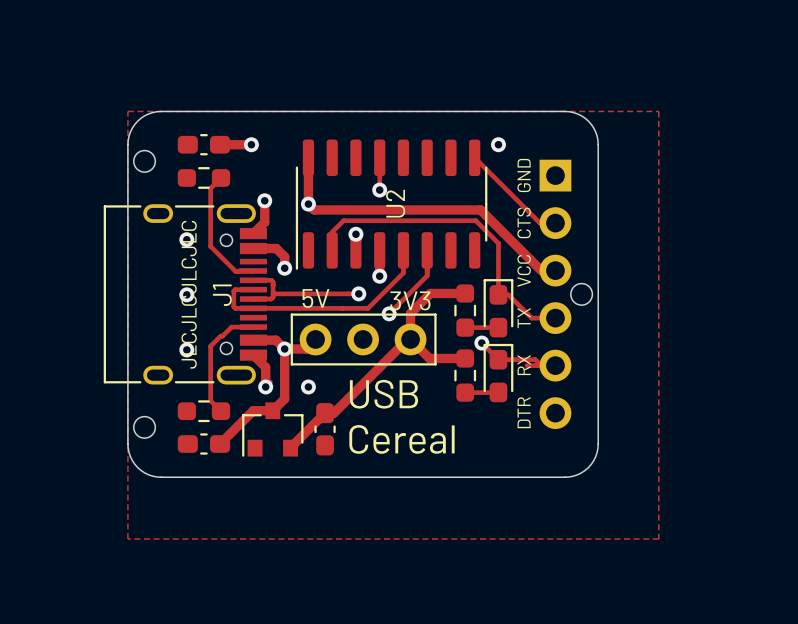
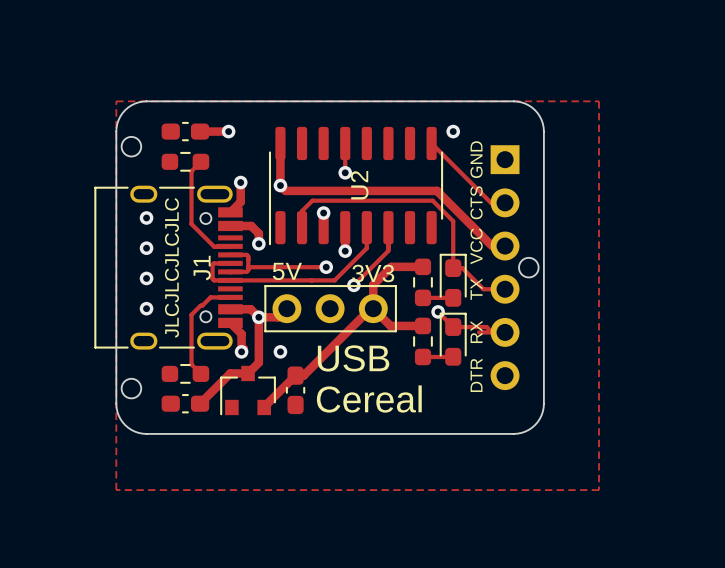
via: none -> (146, 217)
via: (186, 239) -> none
via: none -> (146, 248)
via: (186, 294) -> none
via: none -> (146, 278)
via: none -> (146, 308)
via: (186, 349) -> none

